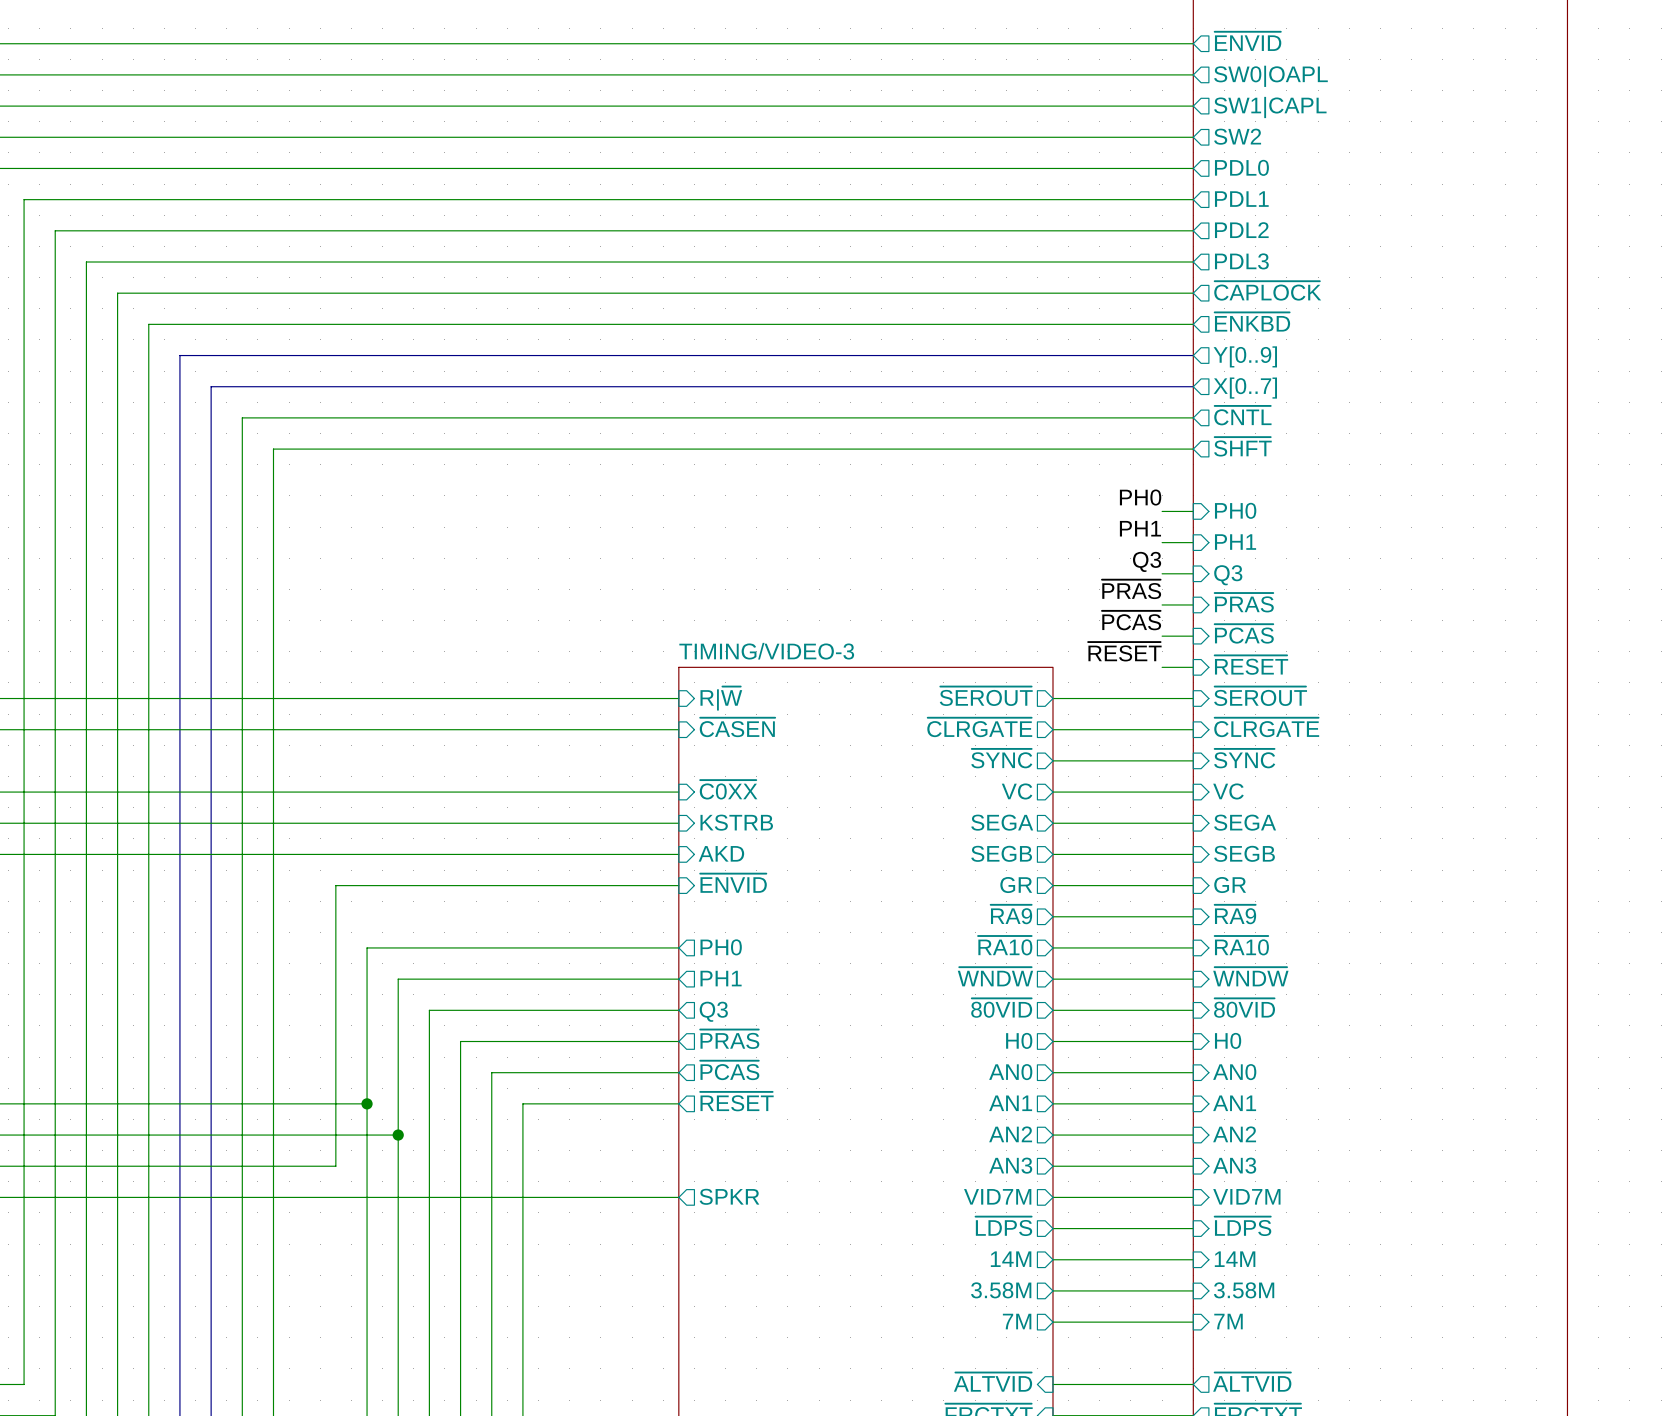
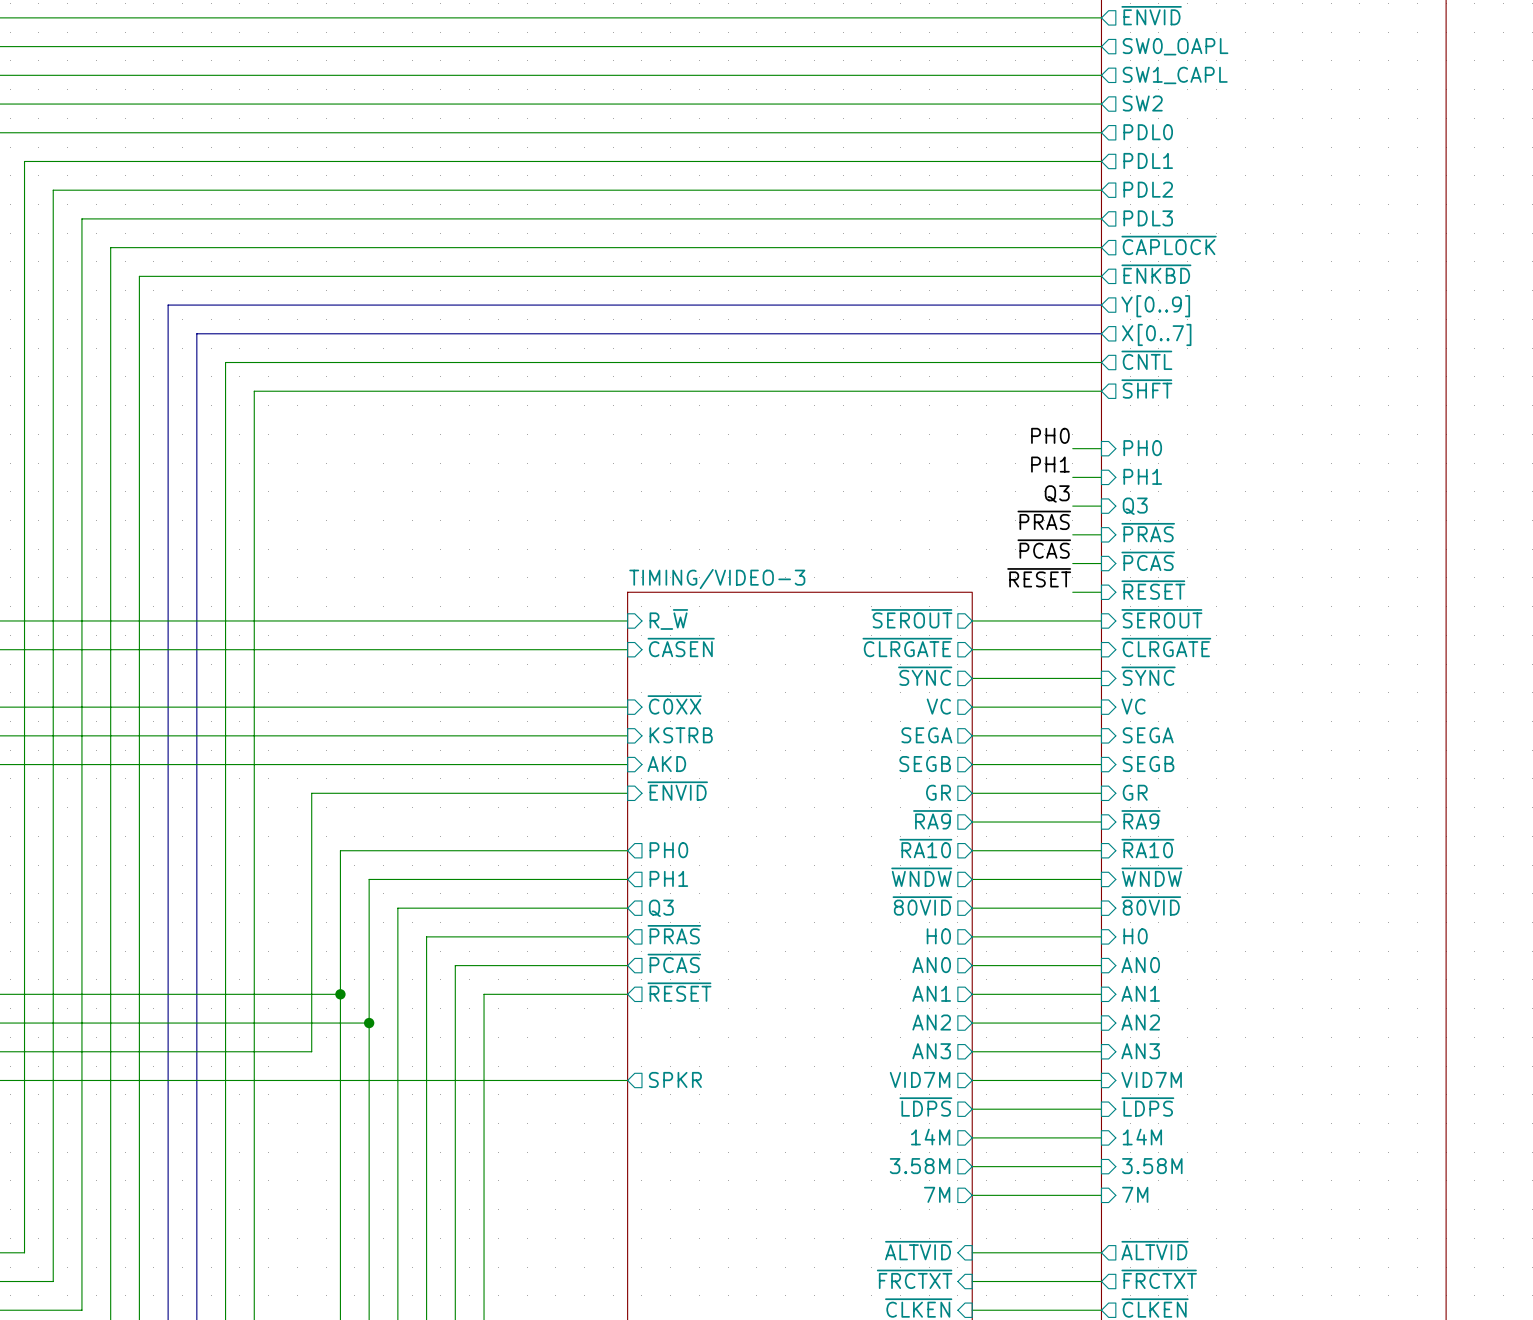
sheet pin: SW0|OAPL (1270, 76) -> SW0_OAPL (1175, 46)
sheet pin: SW1|CAPL (1270, 107) -> SW1_CAPL (1175, 75)
sheet pin: R|~{W} (721, 698) -> R_~{W} (668, 619)

